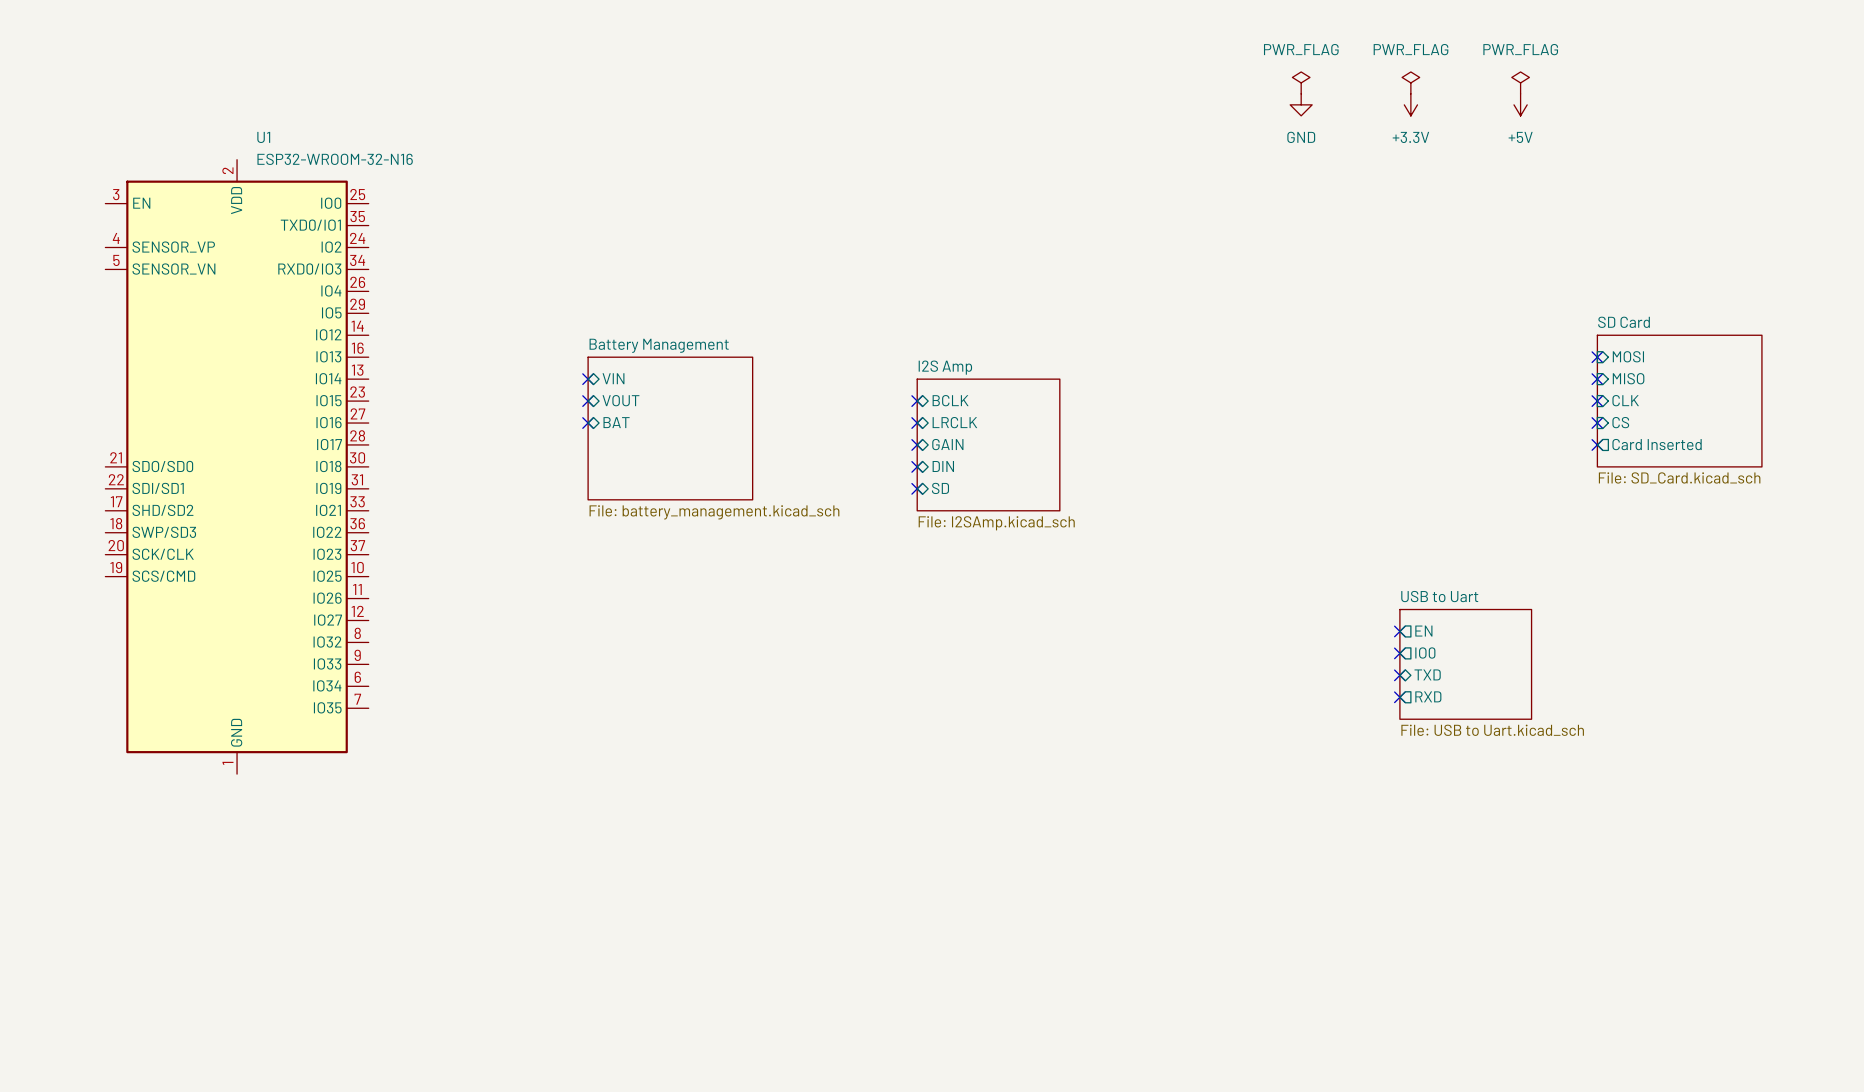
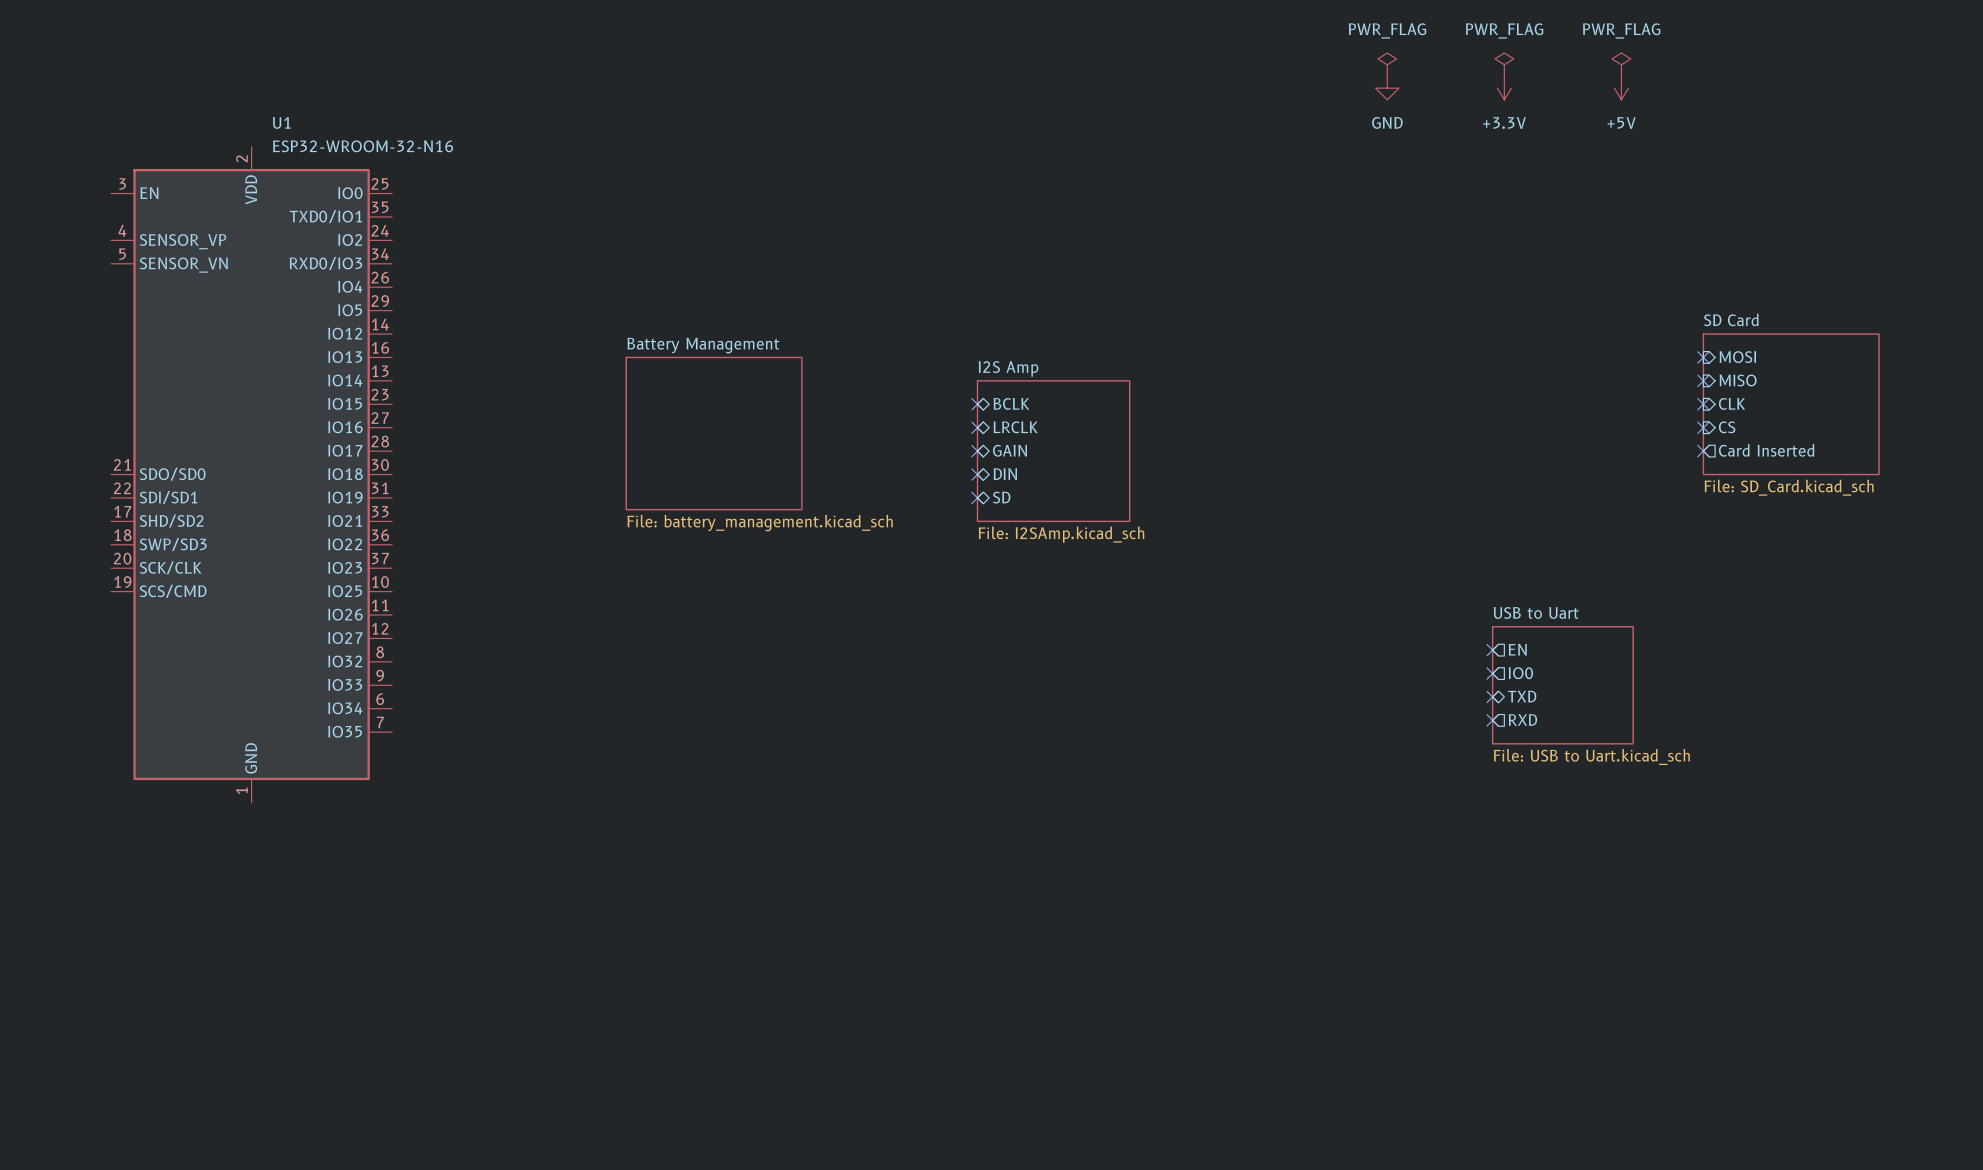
sheet pin: VIN (613, 378) -> none
no-connect mark: (588, 379) -> none
sheet pin: VOUT (620, 400) -> none
no-connect mark: (588, 401) -> none
sheet pin: BAT (616, 422) -> none
no-connect mark: (588, 423) -> none

